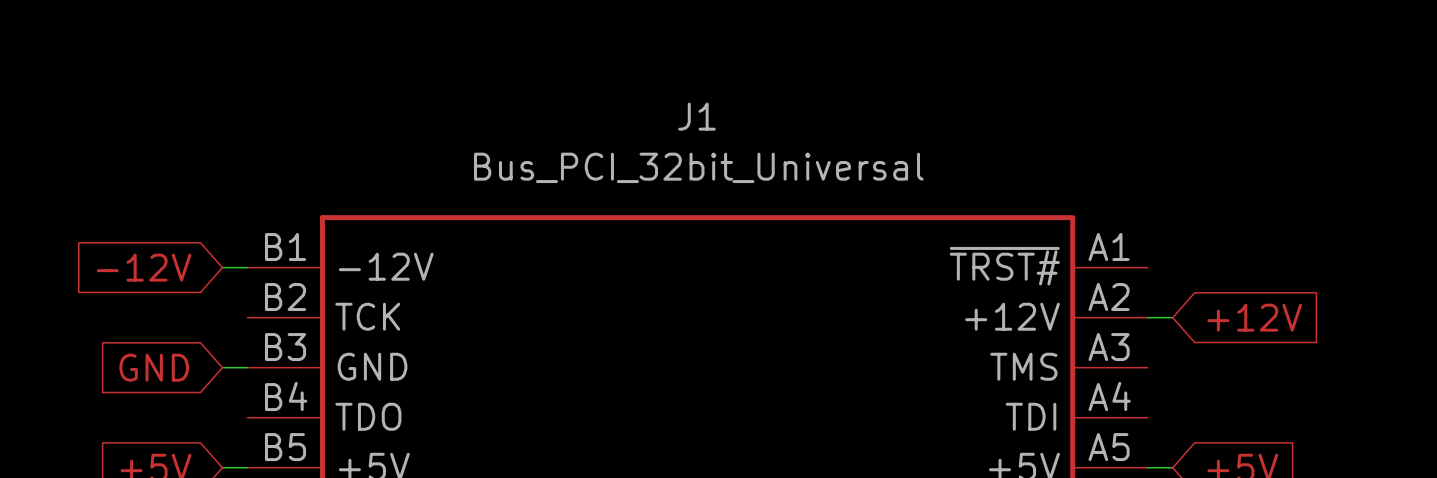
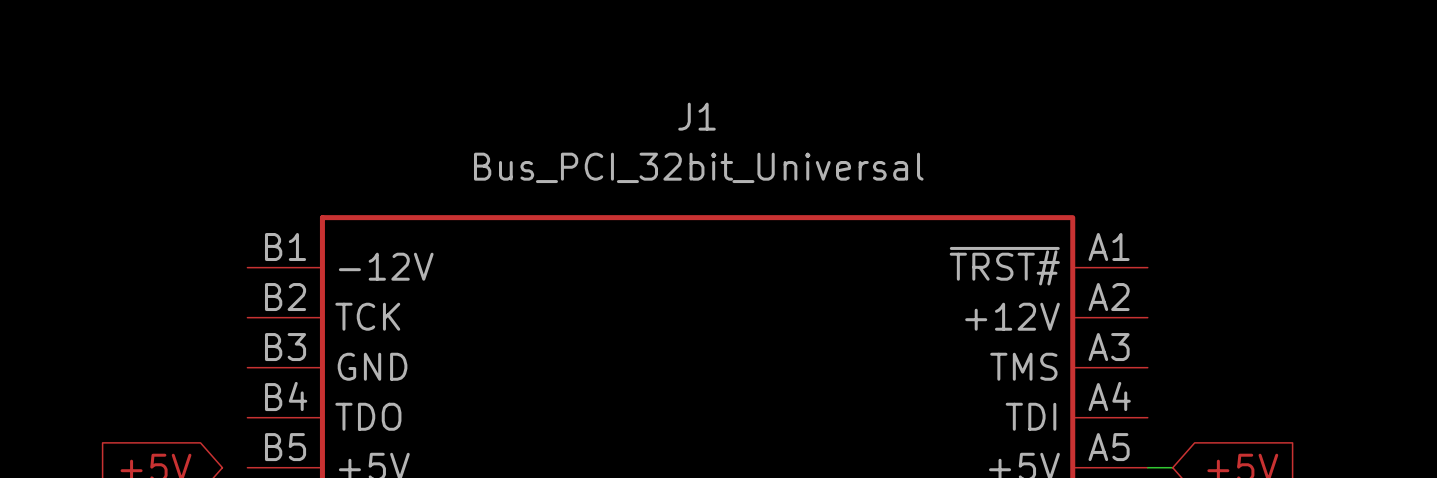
global label: -12V (144, 267) -> none
wire: (222, 267) (247, 267) -> none
wire: (1147, 317) (1172, 317) -> none
global label: +12V (1254, 317) -> none
global label: GND (154, 367) -> none
wire: (222, 367) (247, 367) -> none
wire: (222, 467) (247, 467) -> none

